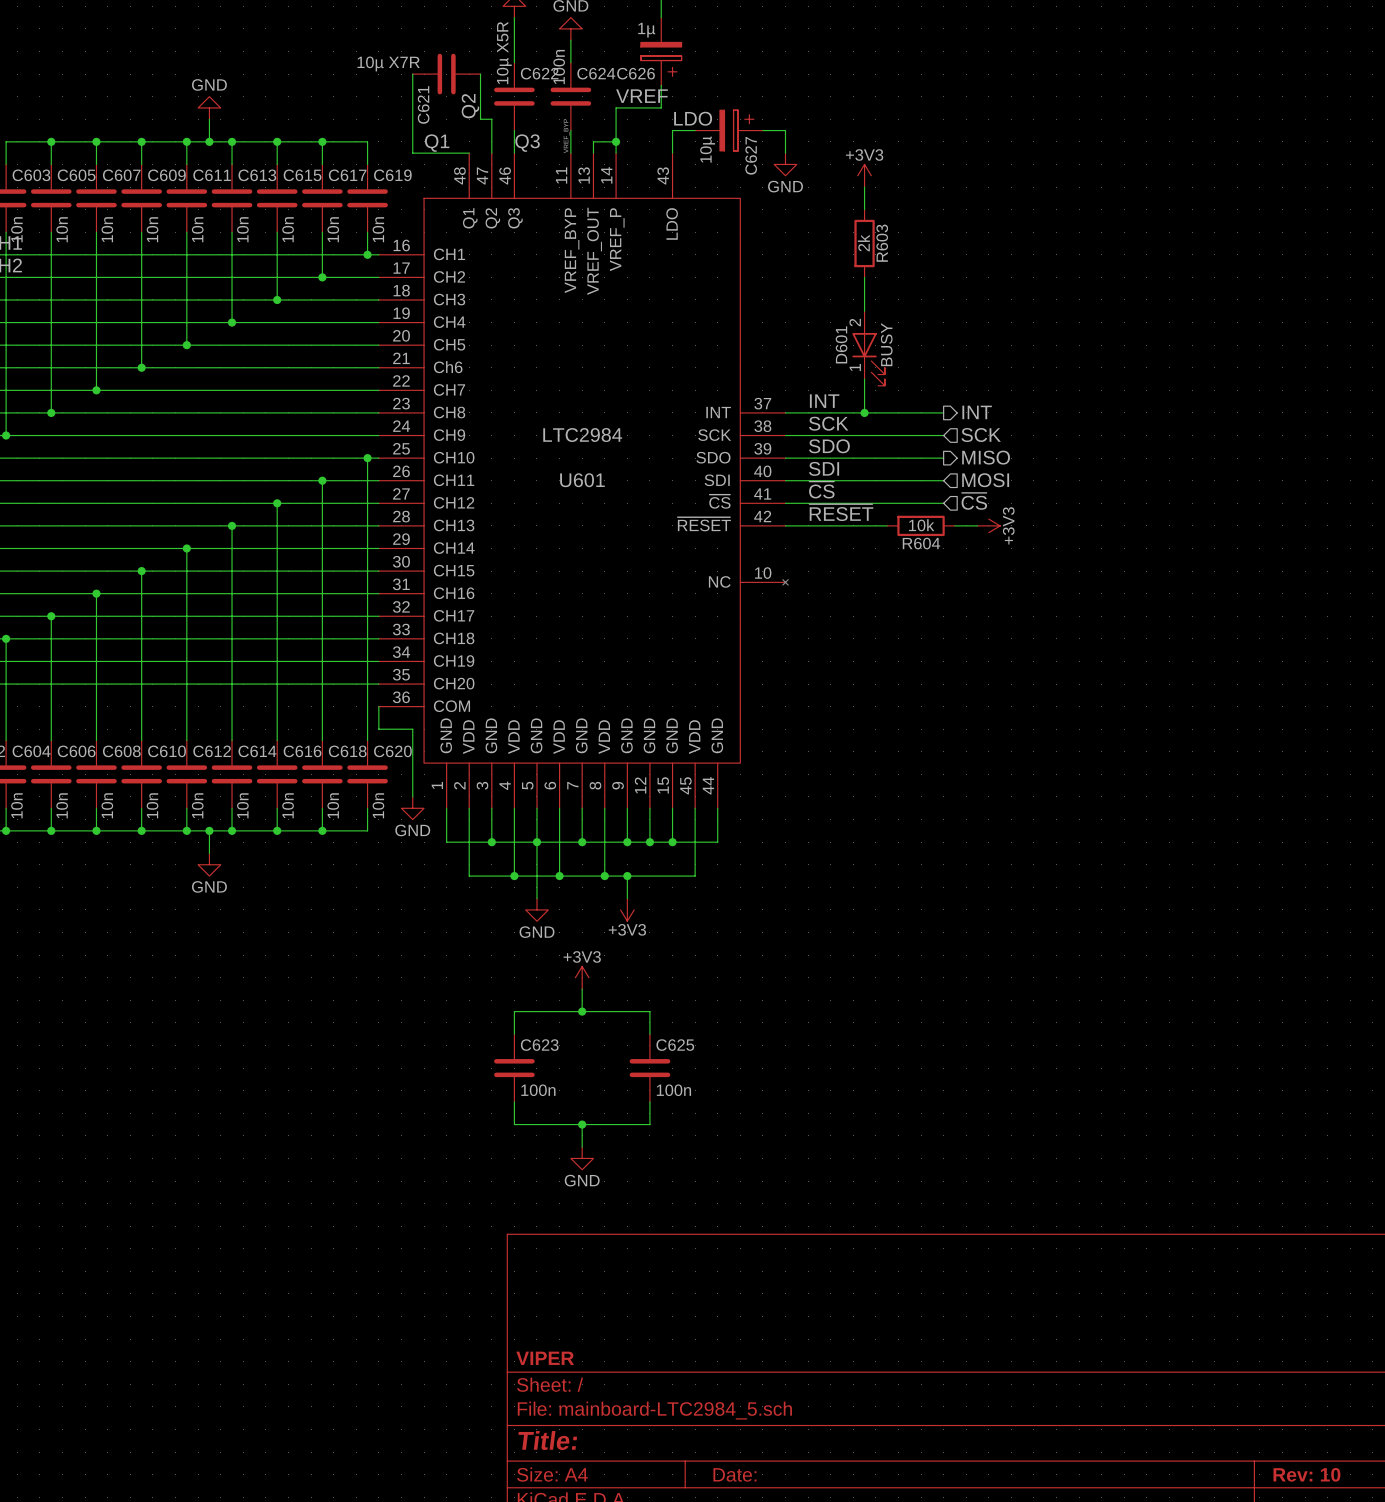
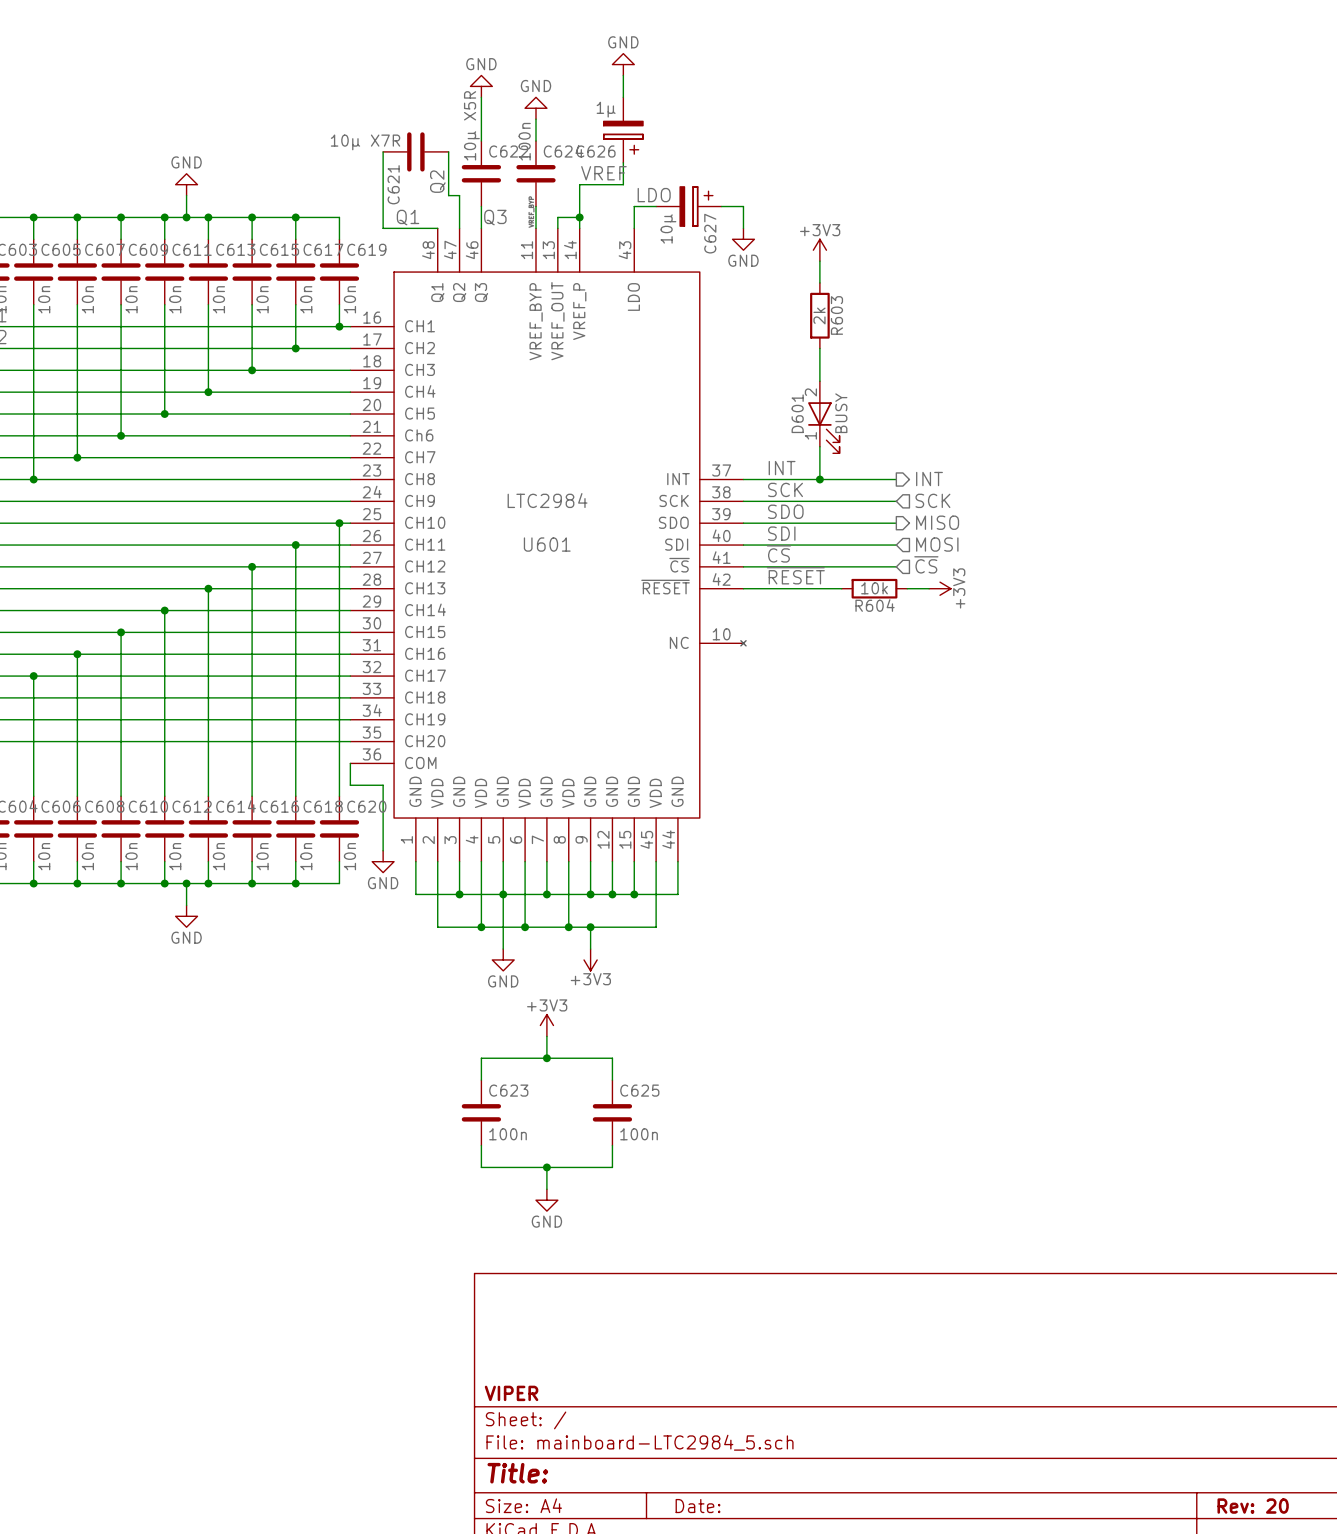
title block: Rev: 10 (1306, 1474) -> Rev: 20 (1253, 1506)

